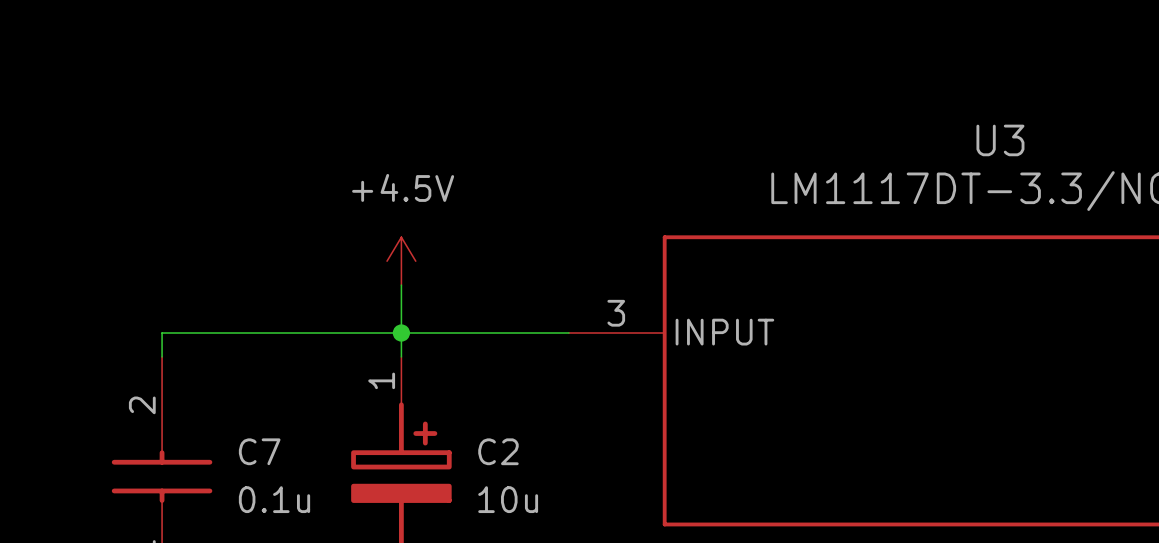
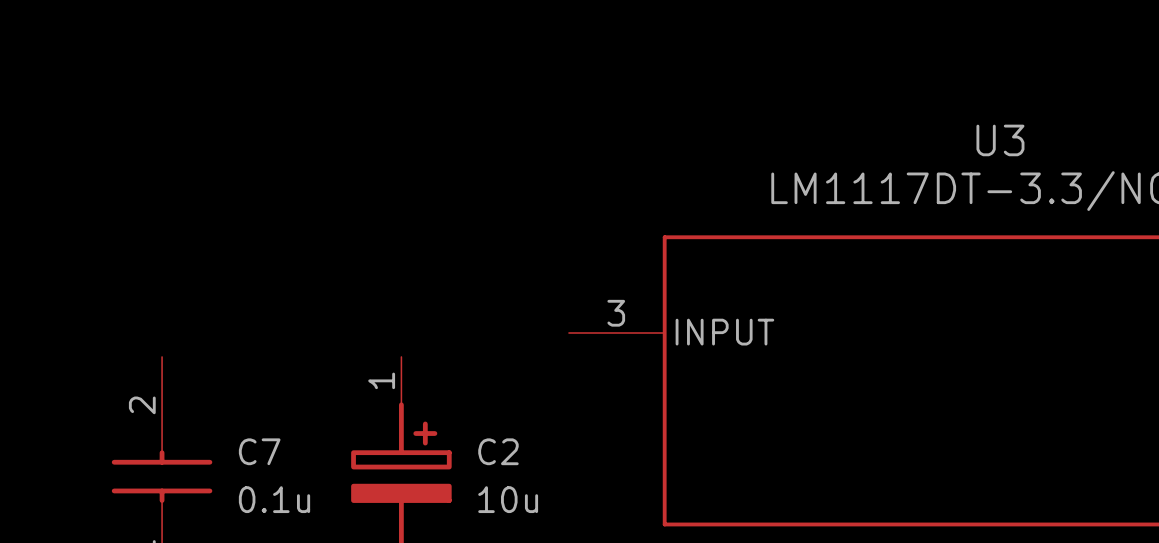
power symbol: +4.5V (401, 261) -> none
wire: (401, 285) (401, 356) -> none
junction: (401, 332) -> none
wire: (568, 332) (162, 332) (162, 356) -> none

